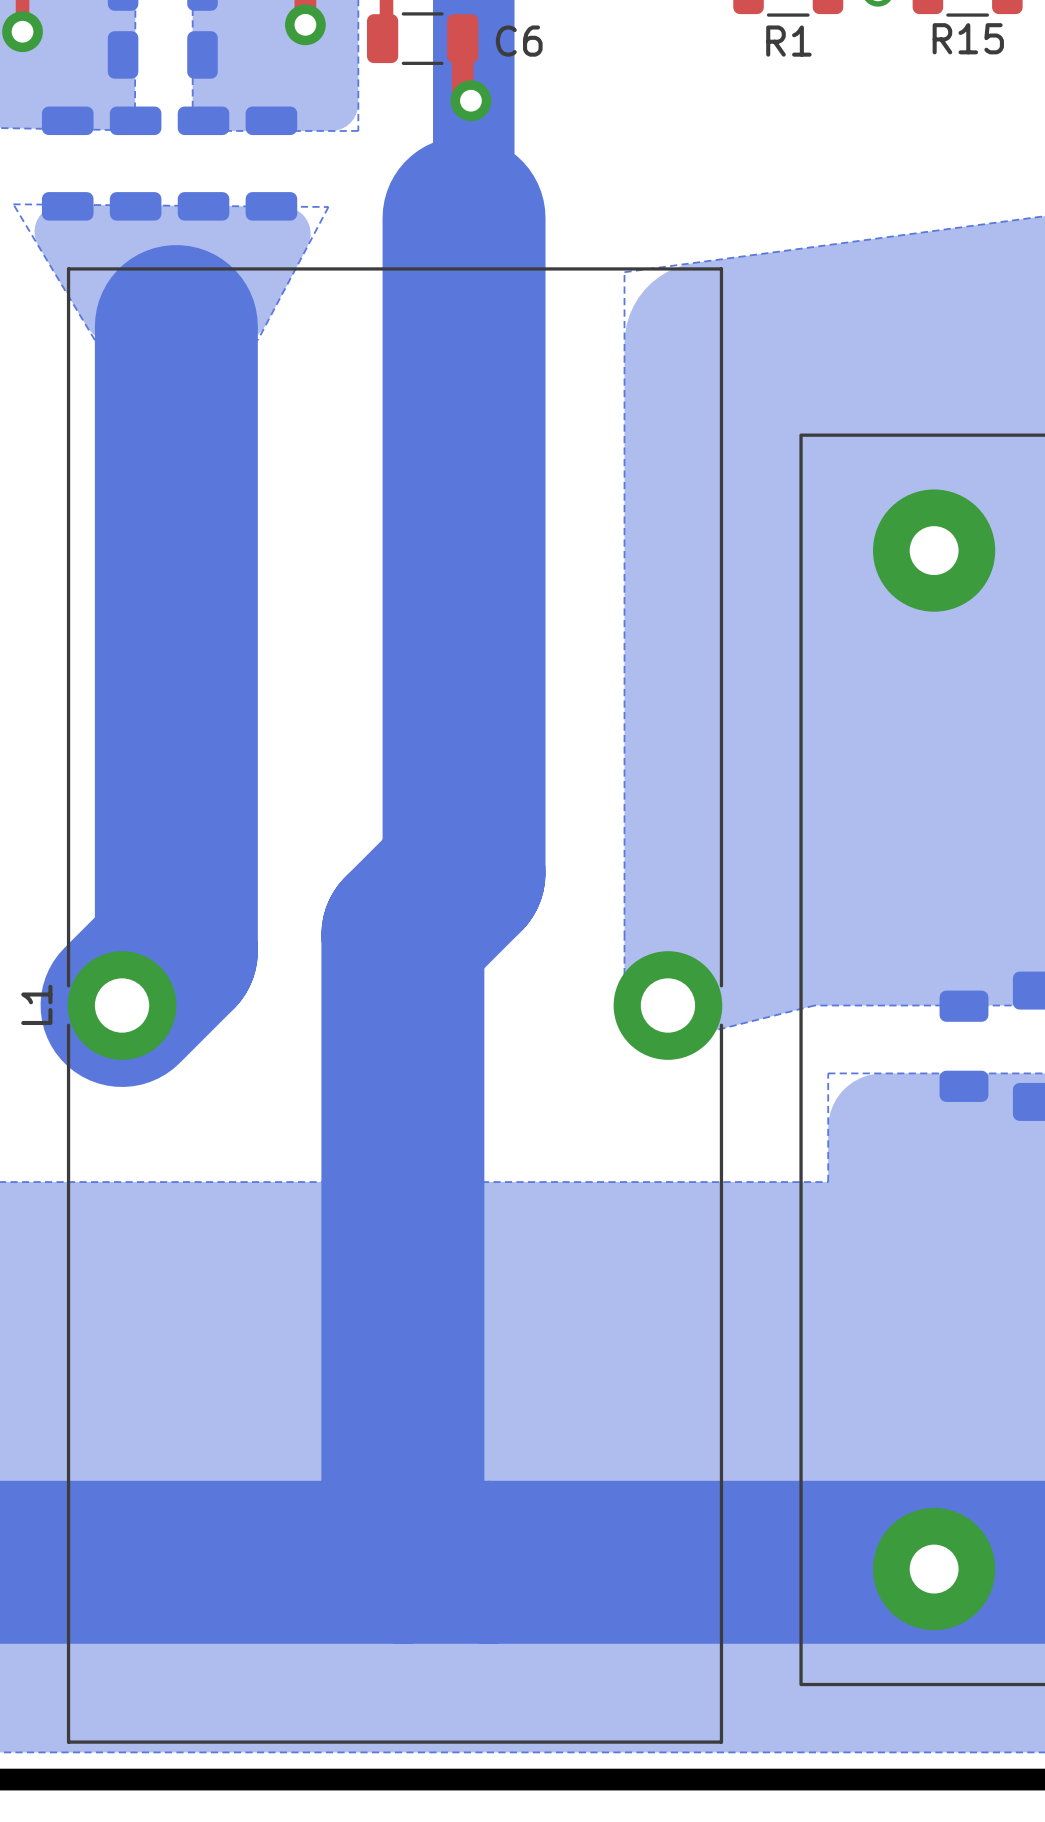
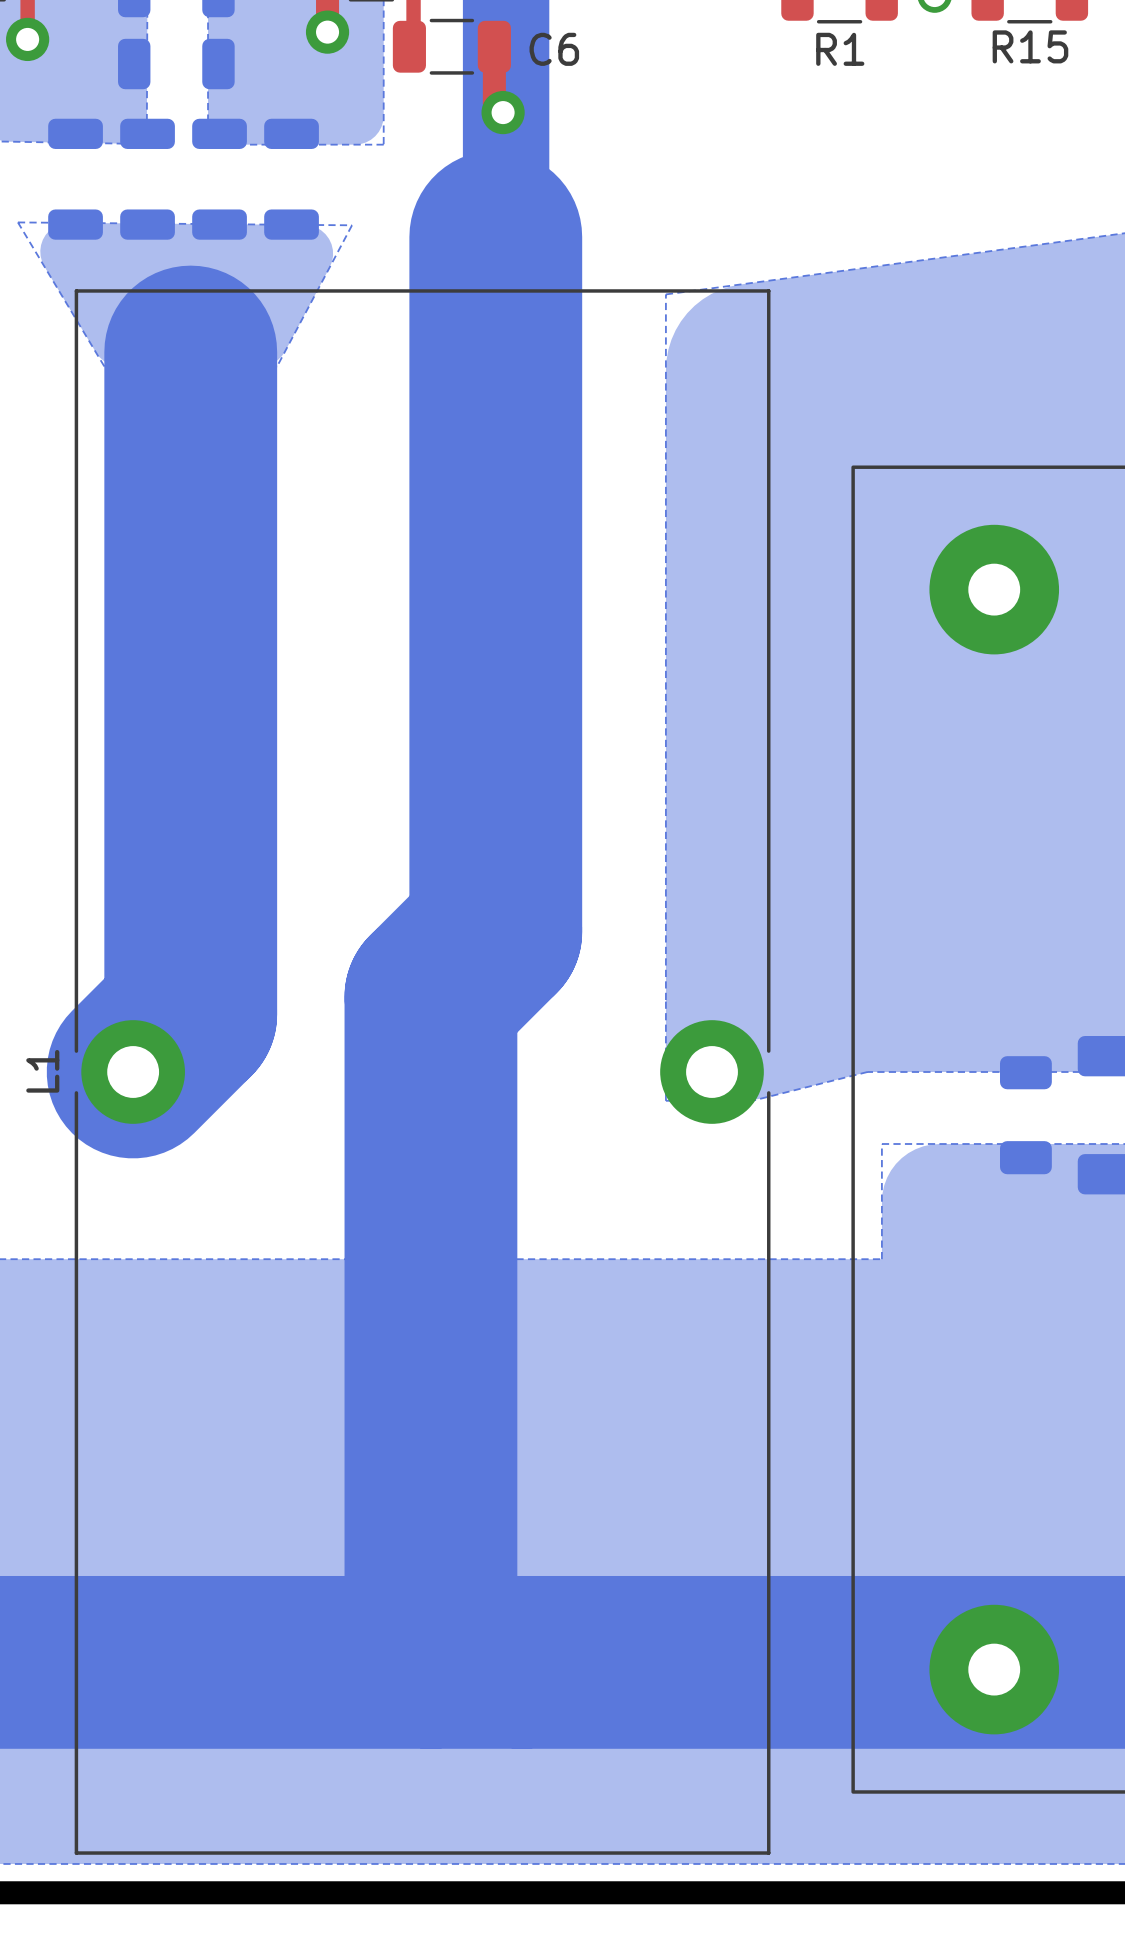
L1 footprint: [66, 267, 724, 1744] -> [74, 289, 771, 1855]

